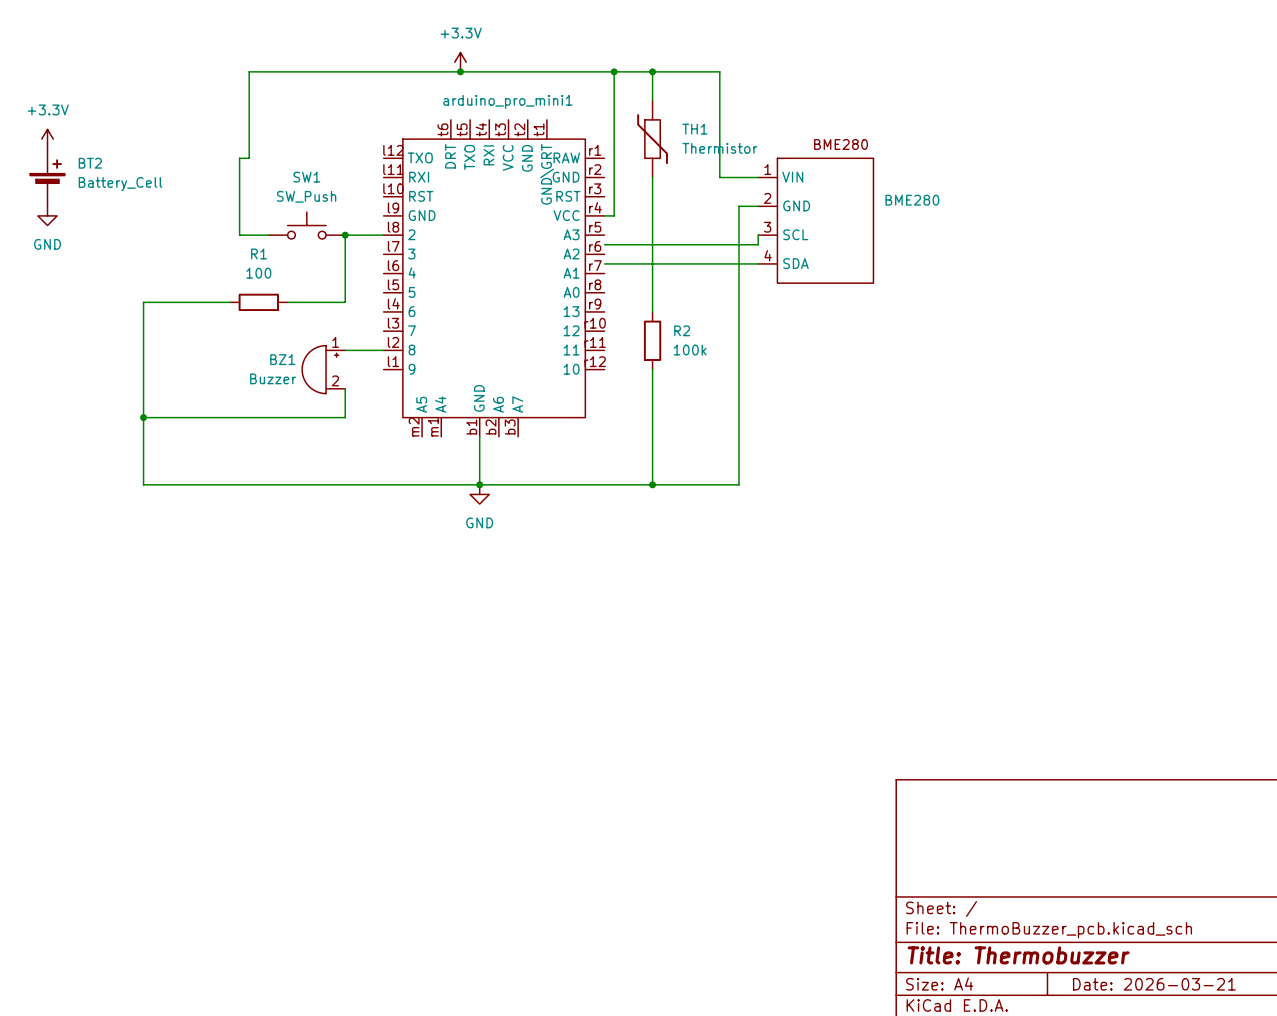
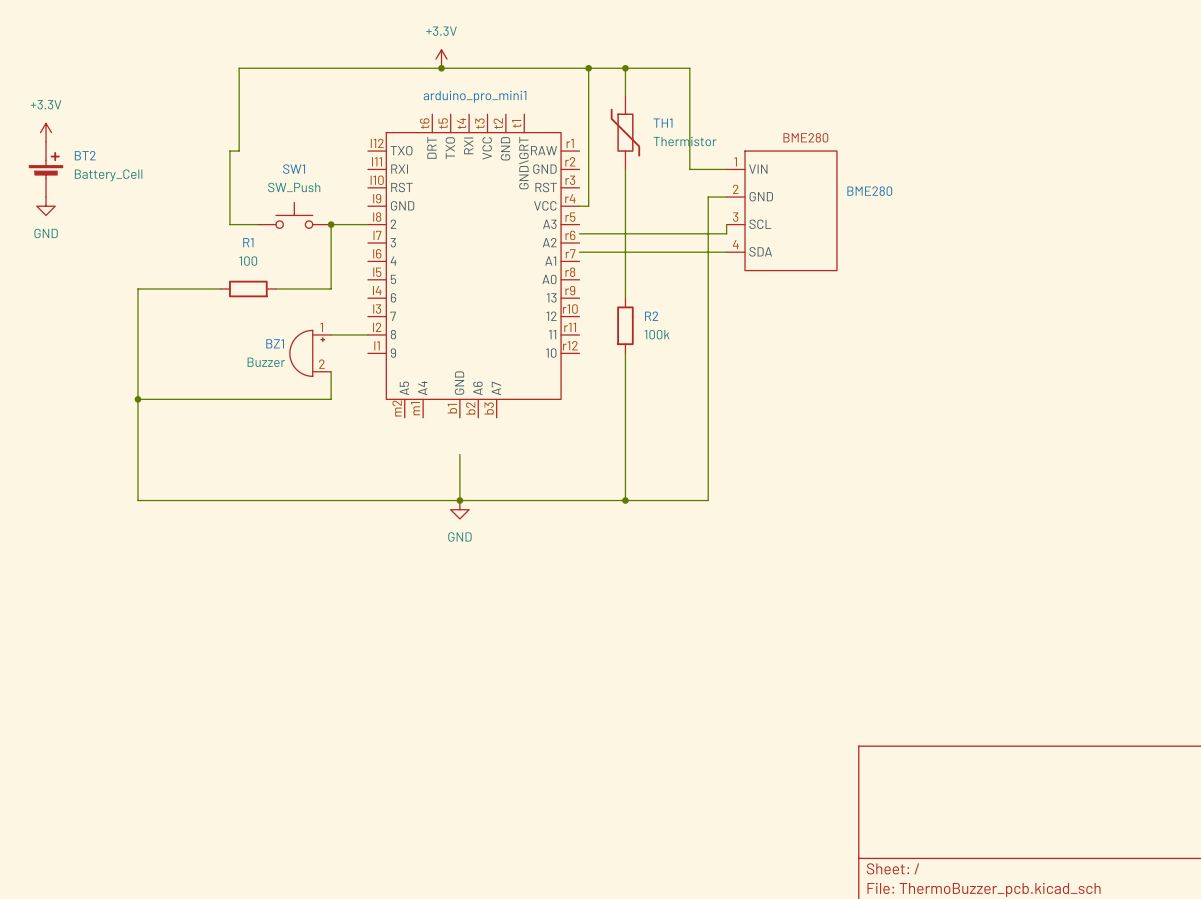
wire: (479, 436) (479, 475) -> (459, 463) (459, 500)
wire: (143, 484) (739, 484) -> (137, 463) (137, 500) (708, 500) (708, 463)
junction position: (479, 484) -> (459, 500)
wire: none -> (625, 463) (625, 500)
junction position: (652, 484) -> (625, 500)
power symbol position: GND (479, 494) -> GND (459, 509)

